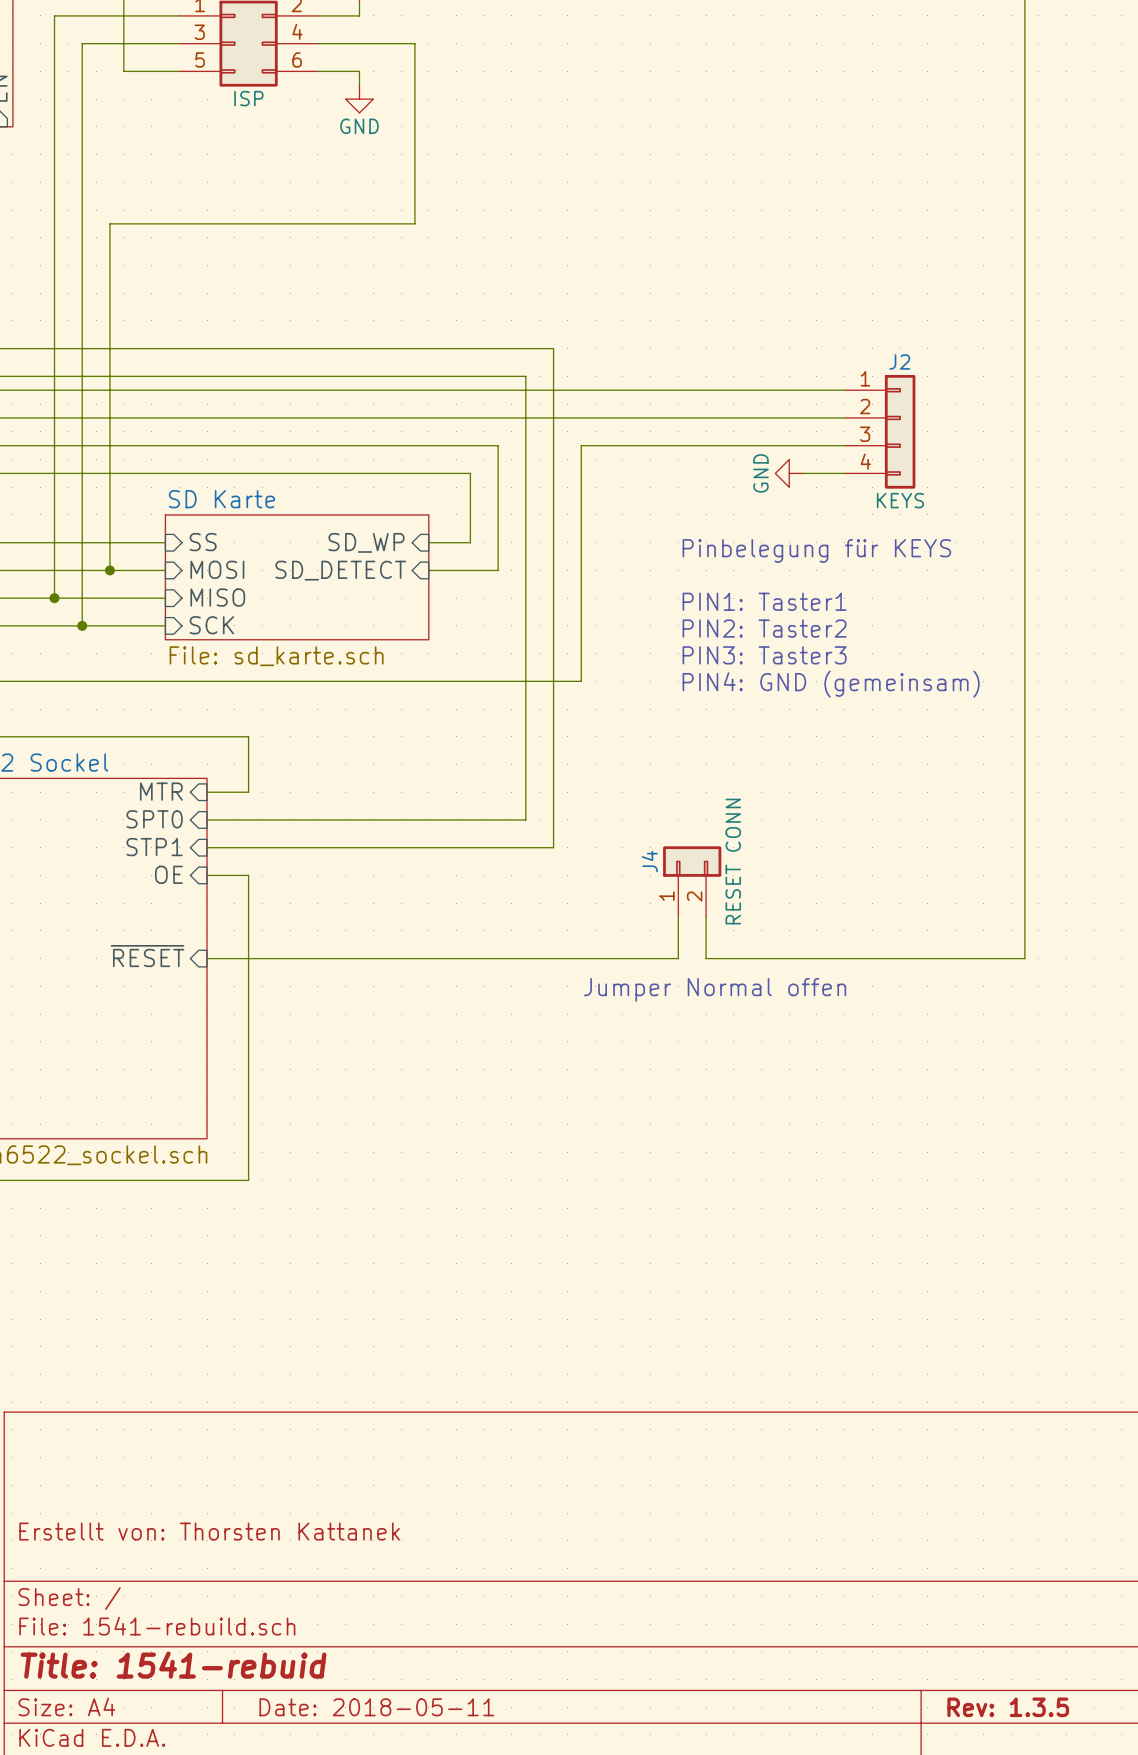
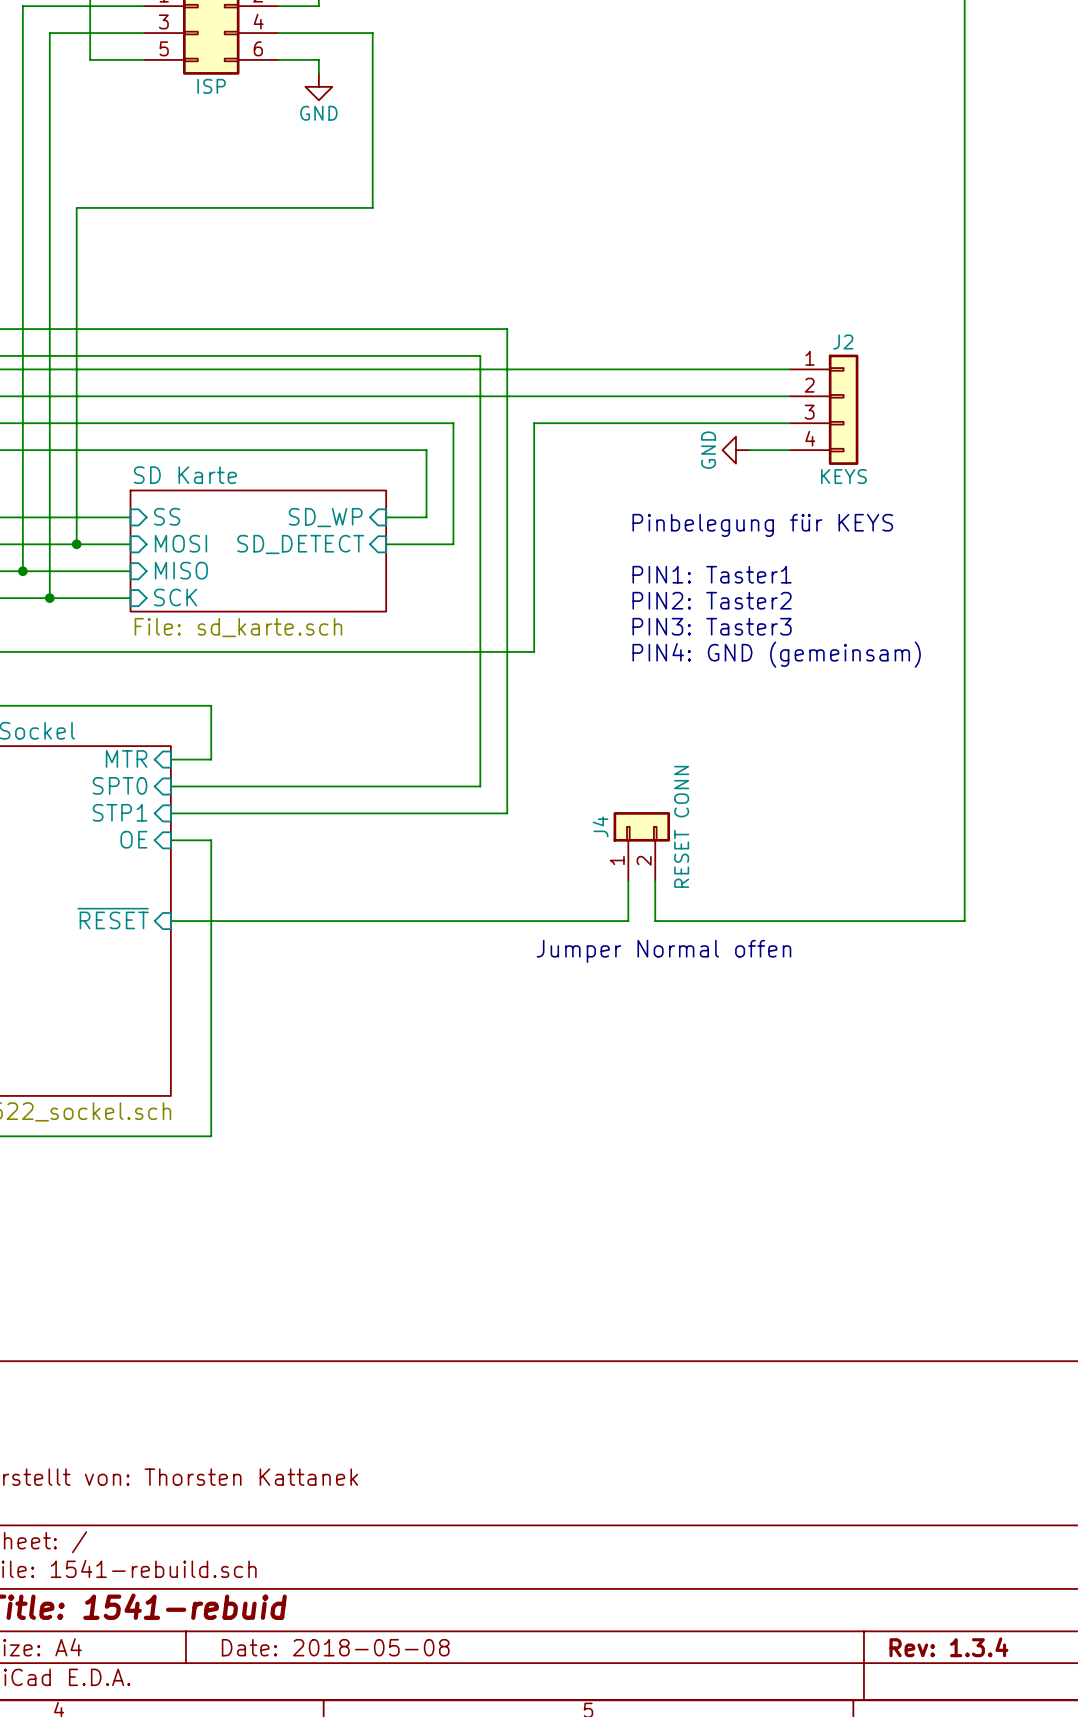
title block: Date: 2018-05-11 (376, 1707) -> Date: 2018-05-08 (335, 1647)
title block: Rev: 1.3.5 (1008, 1707) -> Rev: 1.3.4 (948, 1647)

